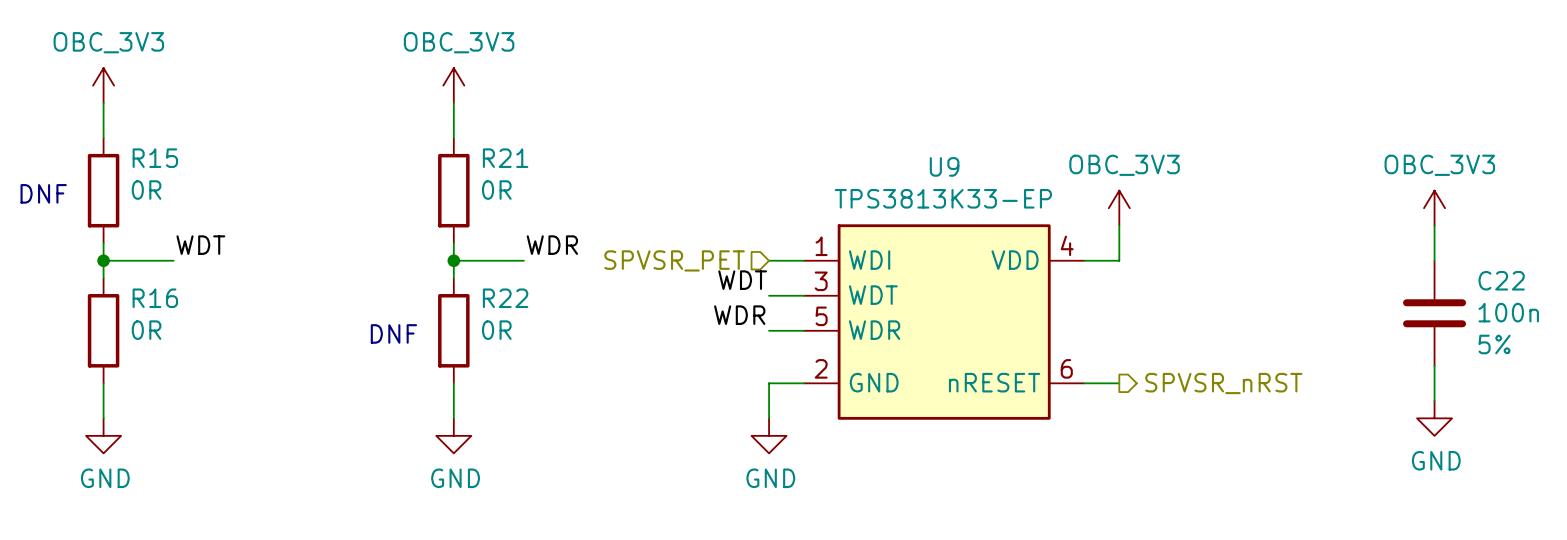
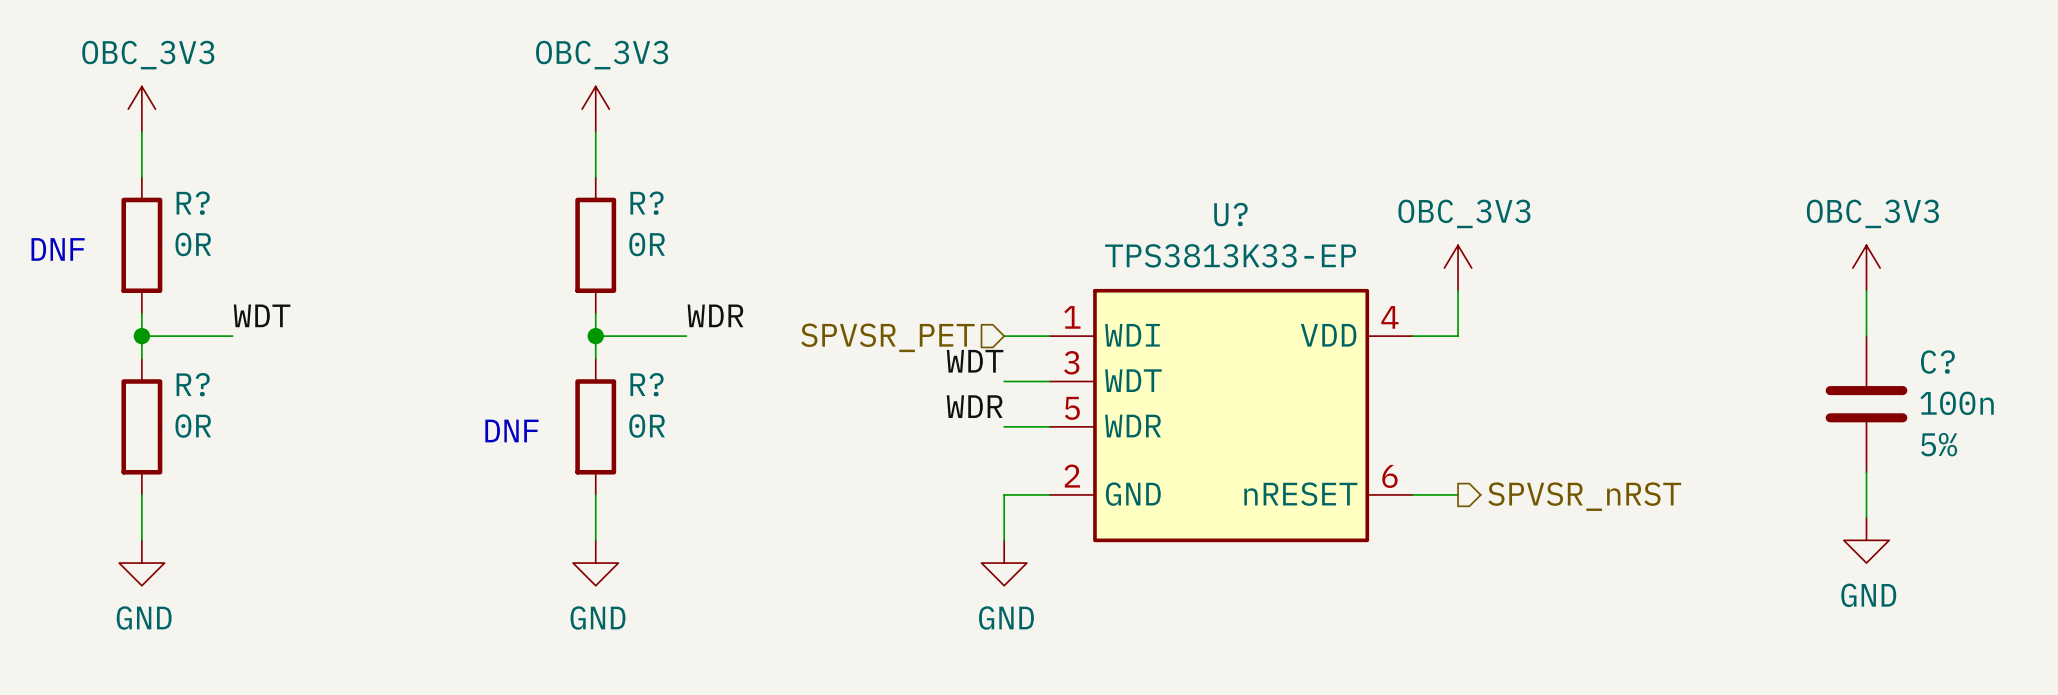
R15 name: R15 (155, 158) -> R? (193, 203)
R21 name: R21 (505, 158) -> R? (647, 203)
U9 name: U9 (944, 166) -> U? (1230, 214)
C22 name: C22 (1501, 280) -> C? (1937, 362)
R16 name: R16 (155, 298) -> R? (193, 384)
R22 name: R22 (505, 298) -> R? (647, 384)

